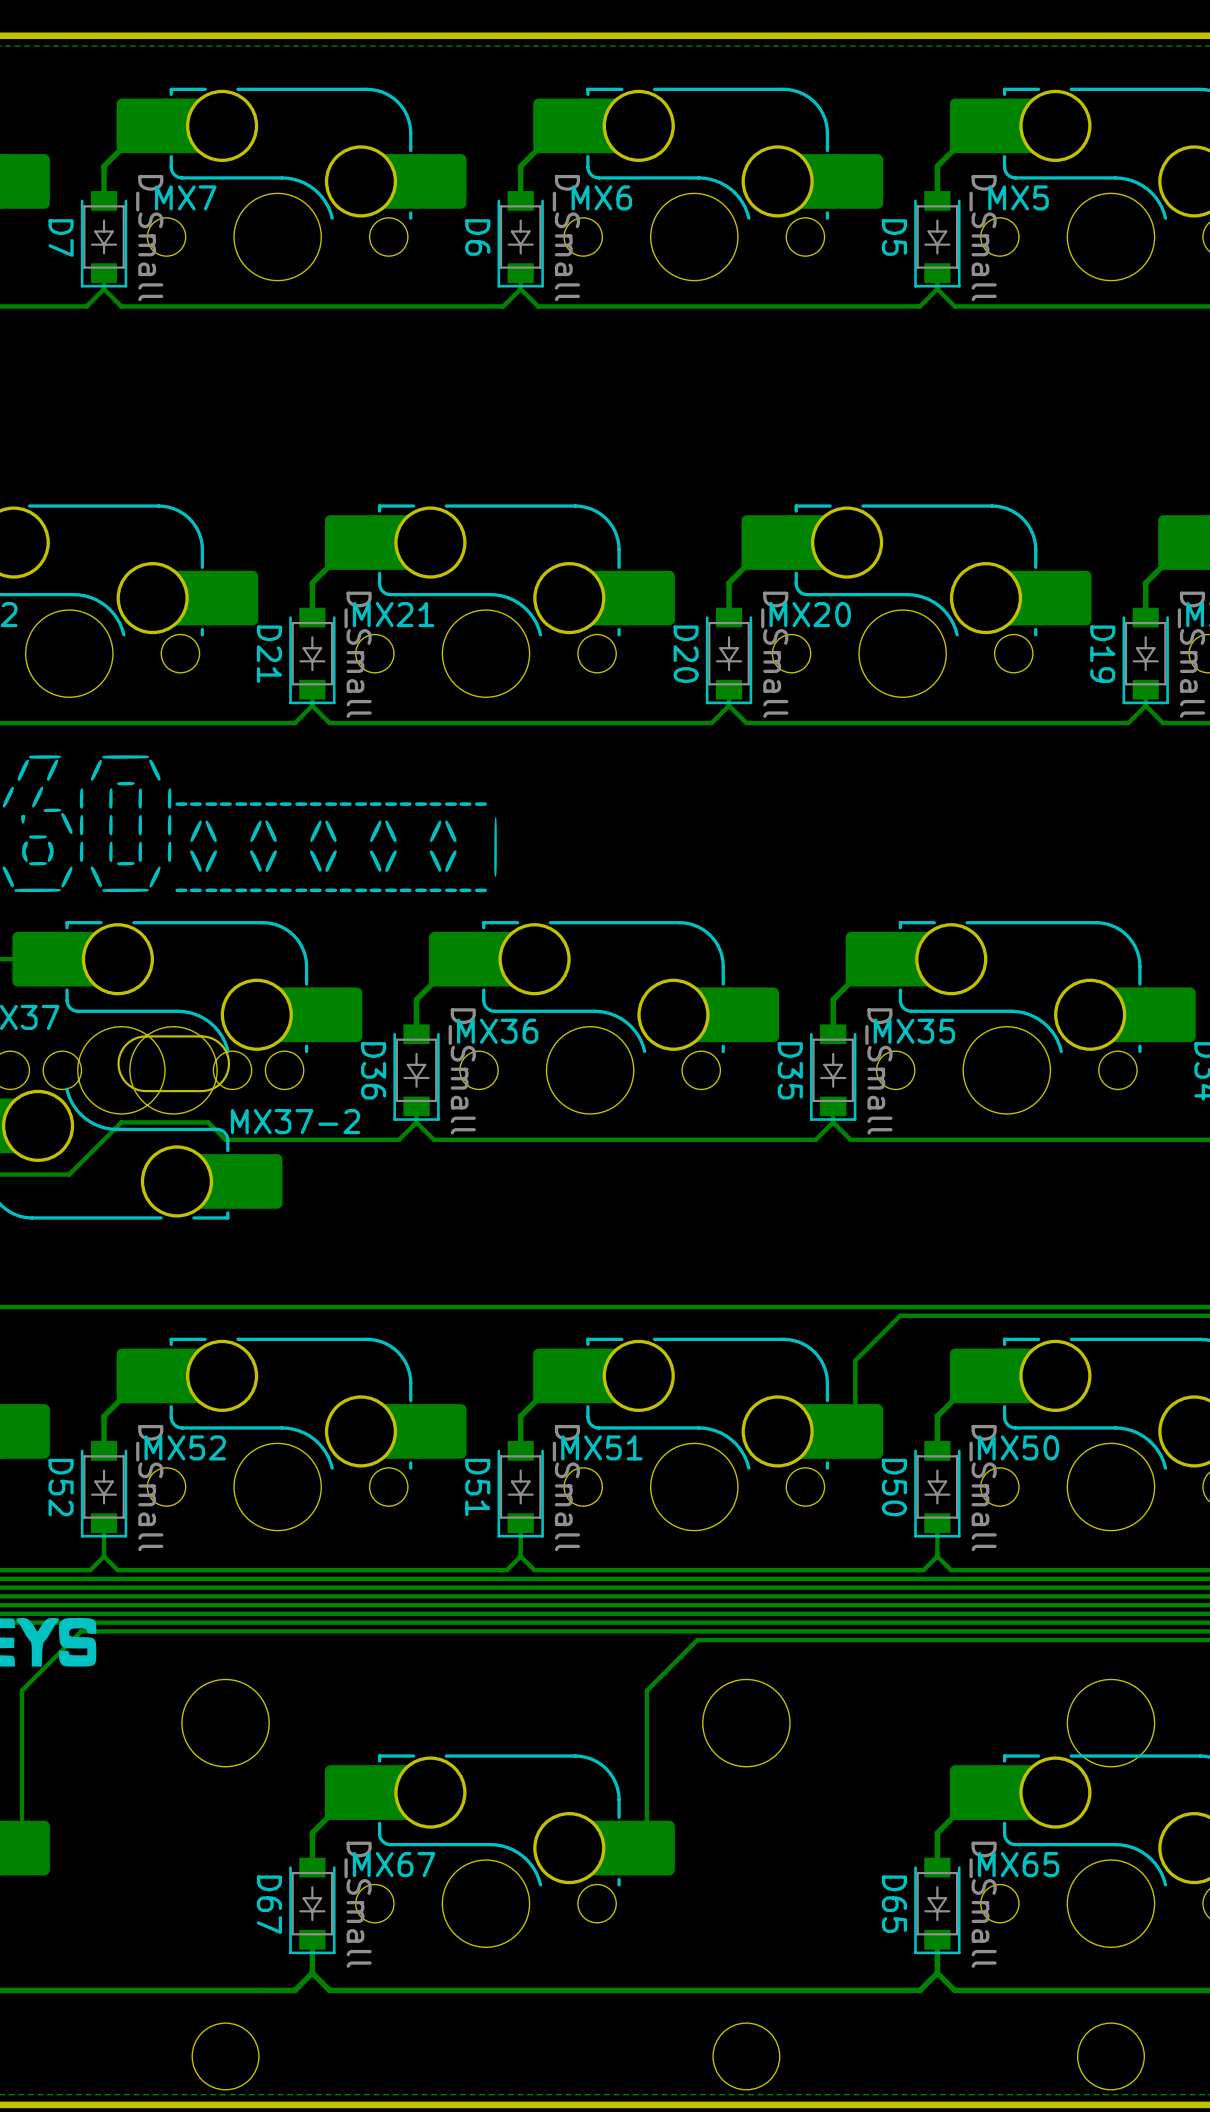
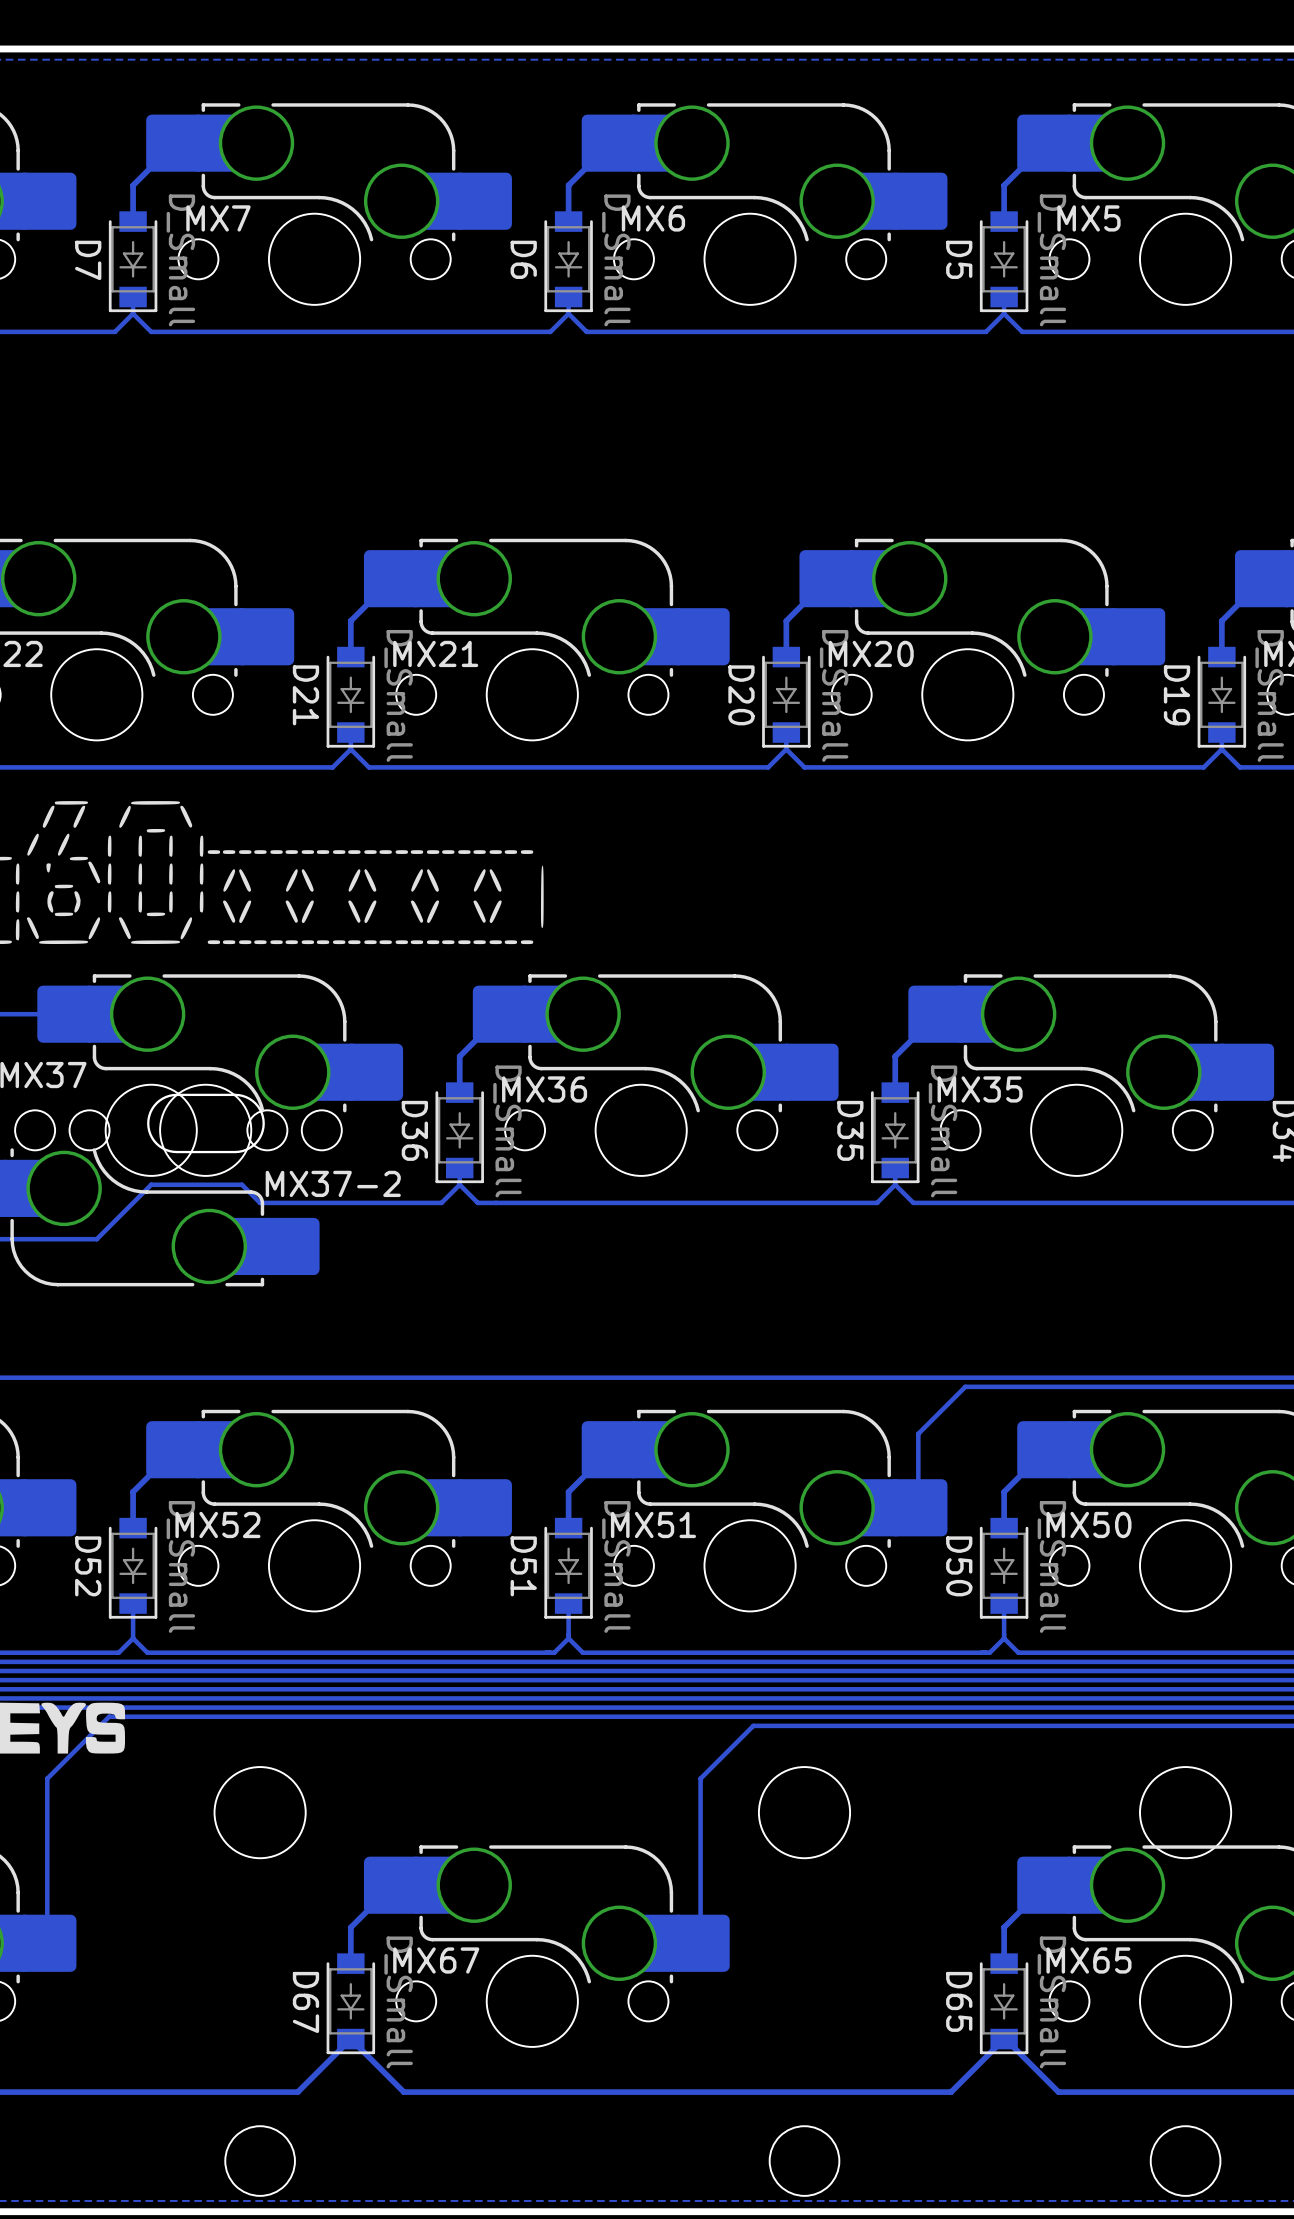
track: (312, 1939) (312, 1973) -> none
track: (937, 1939) (937, 1973) -> none
track: (312, 1973) (329, 1990) (363, 1990) -> (297, 2092) (350, 2039) (403, 2092)
track: (312, 1973) (295, 1990) (261, 1990) -> none
track: (937, 1973) (954, 1990) (989, 1990) -> (951, 2092) (1004, 2039) (1058, 2092)
track: (937, 1973) (920, 1990) (886, 1990) -> none

